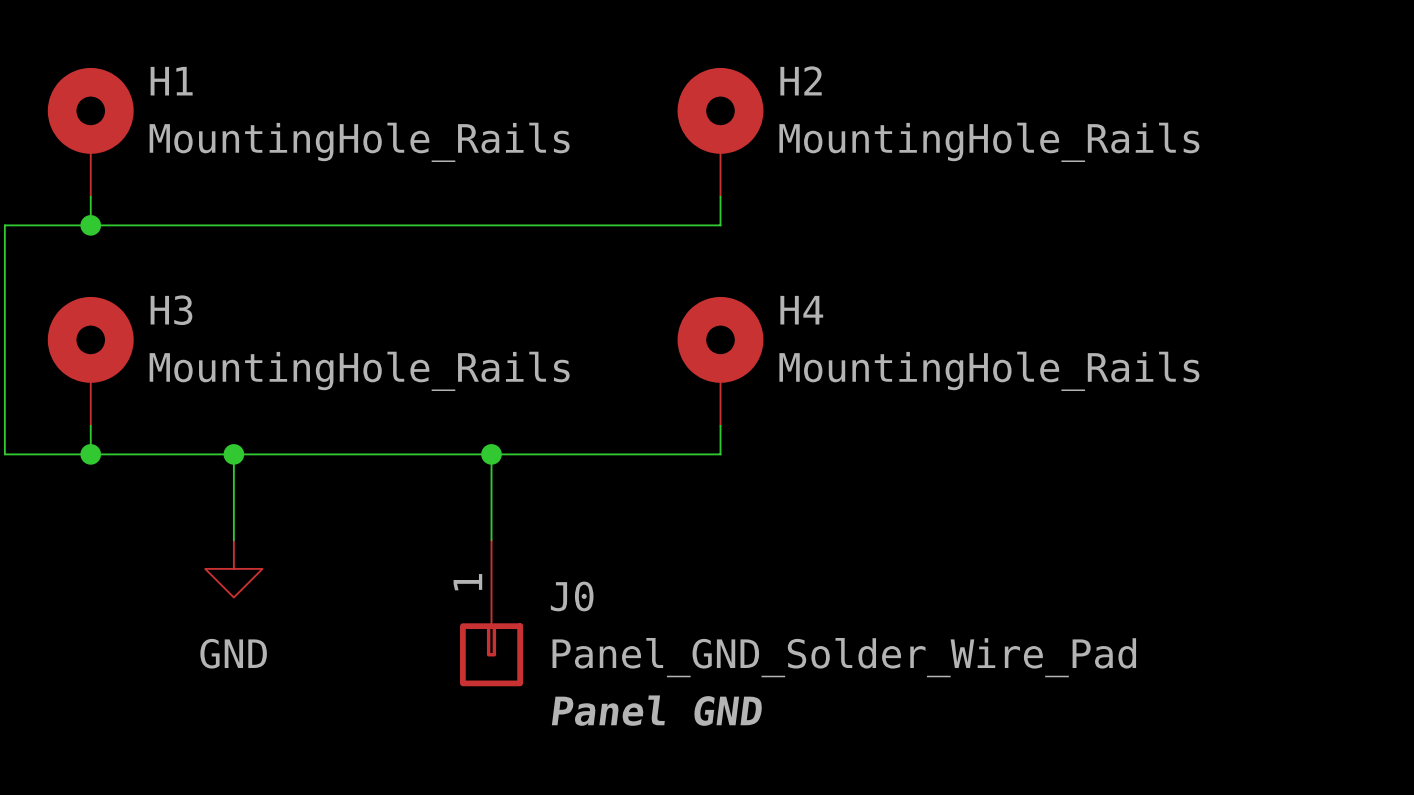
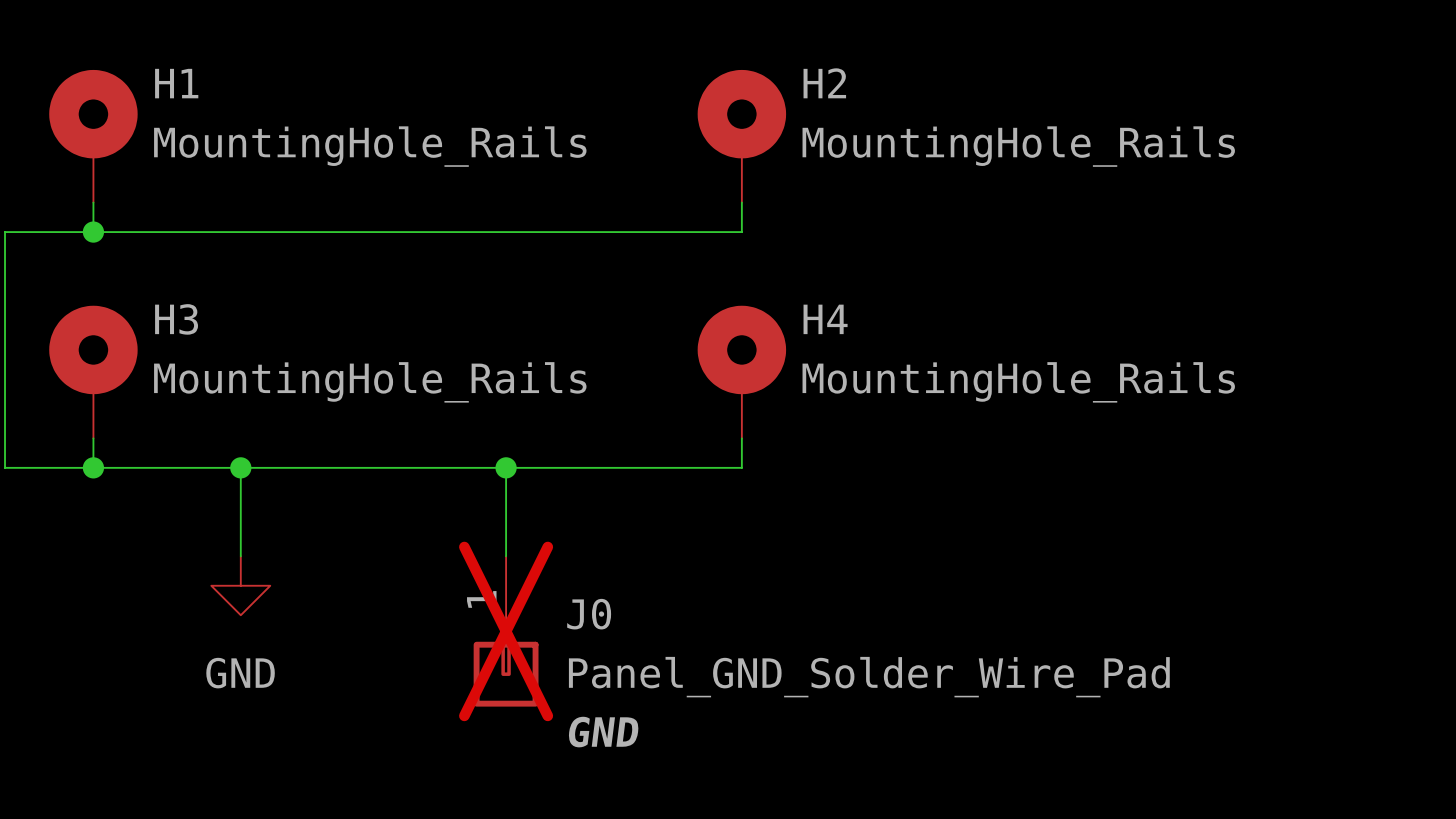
J0 do-not-place cross: none -> (506, 631)
J0 text: Panel GND (657, 710) -> GND (603, 732)

